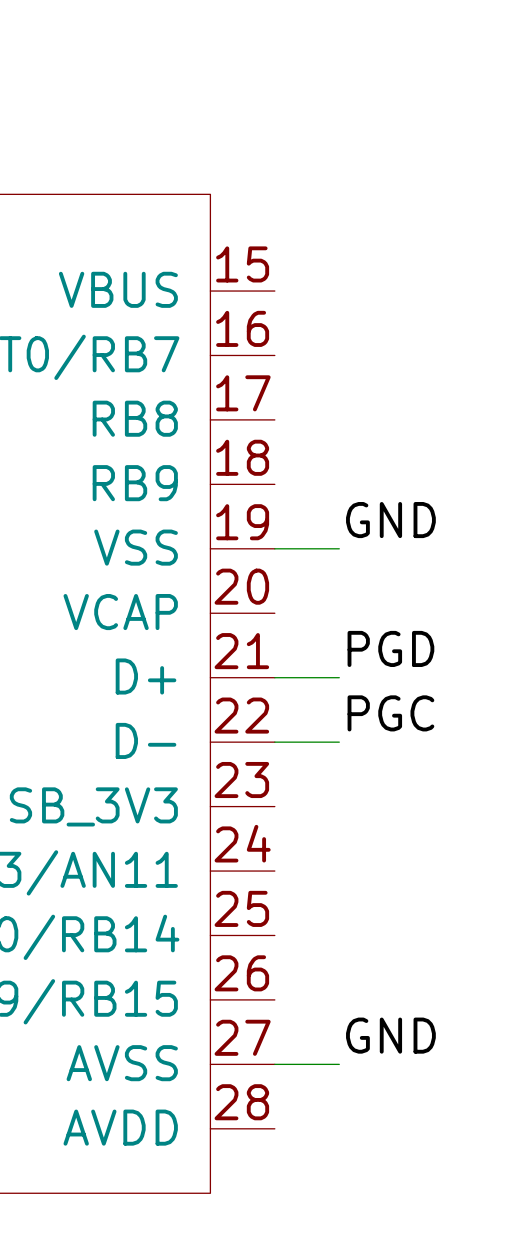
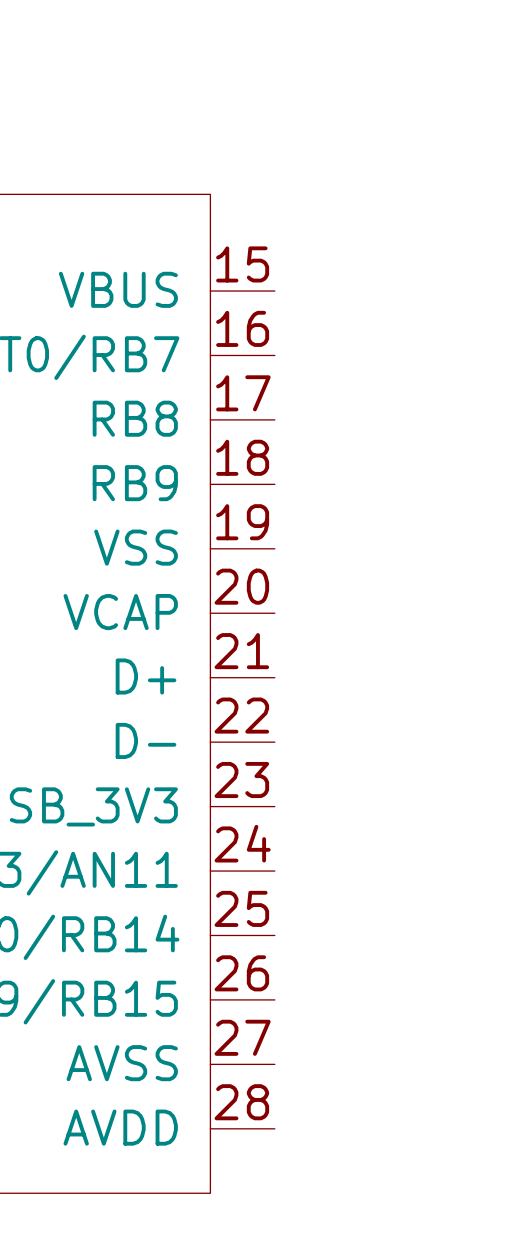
label: GND (390, 520) -> none
wire: (274, 548) (339, 548) -> none
label: PGD (390, 648) -> none
wire: (274, 677) (339, 677) -> none
label: PGC (390, 713) -> none
wire: (274, 742) (339, 742) -> none
label: GND (390, 1035) -> none
wire: (274, 1064) (339, 1064) -> none

